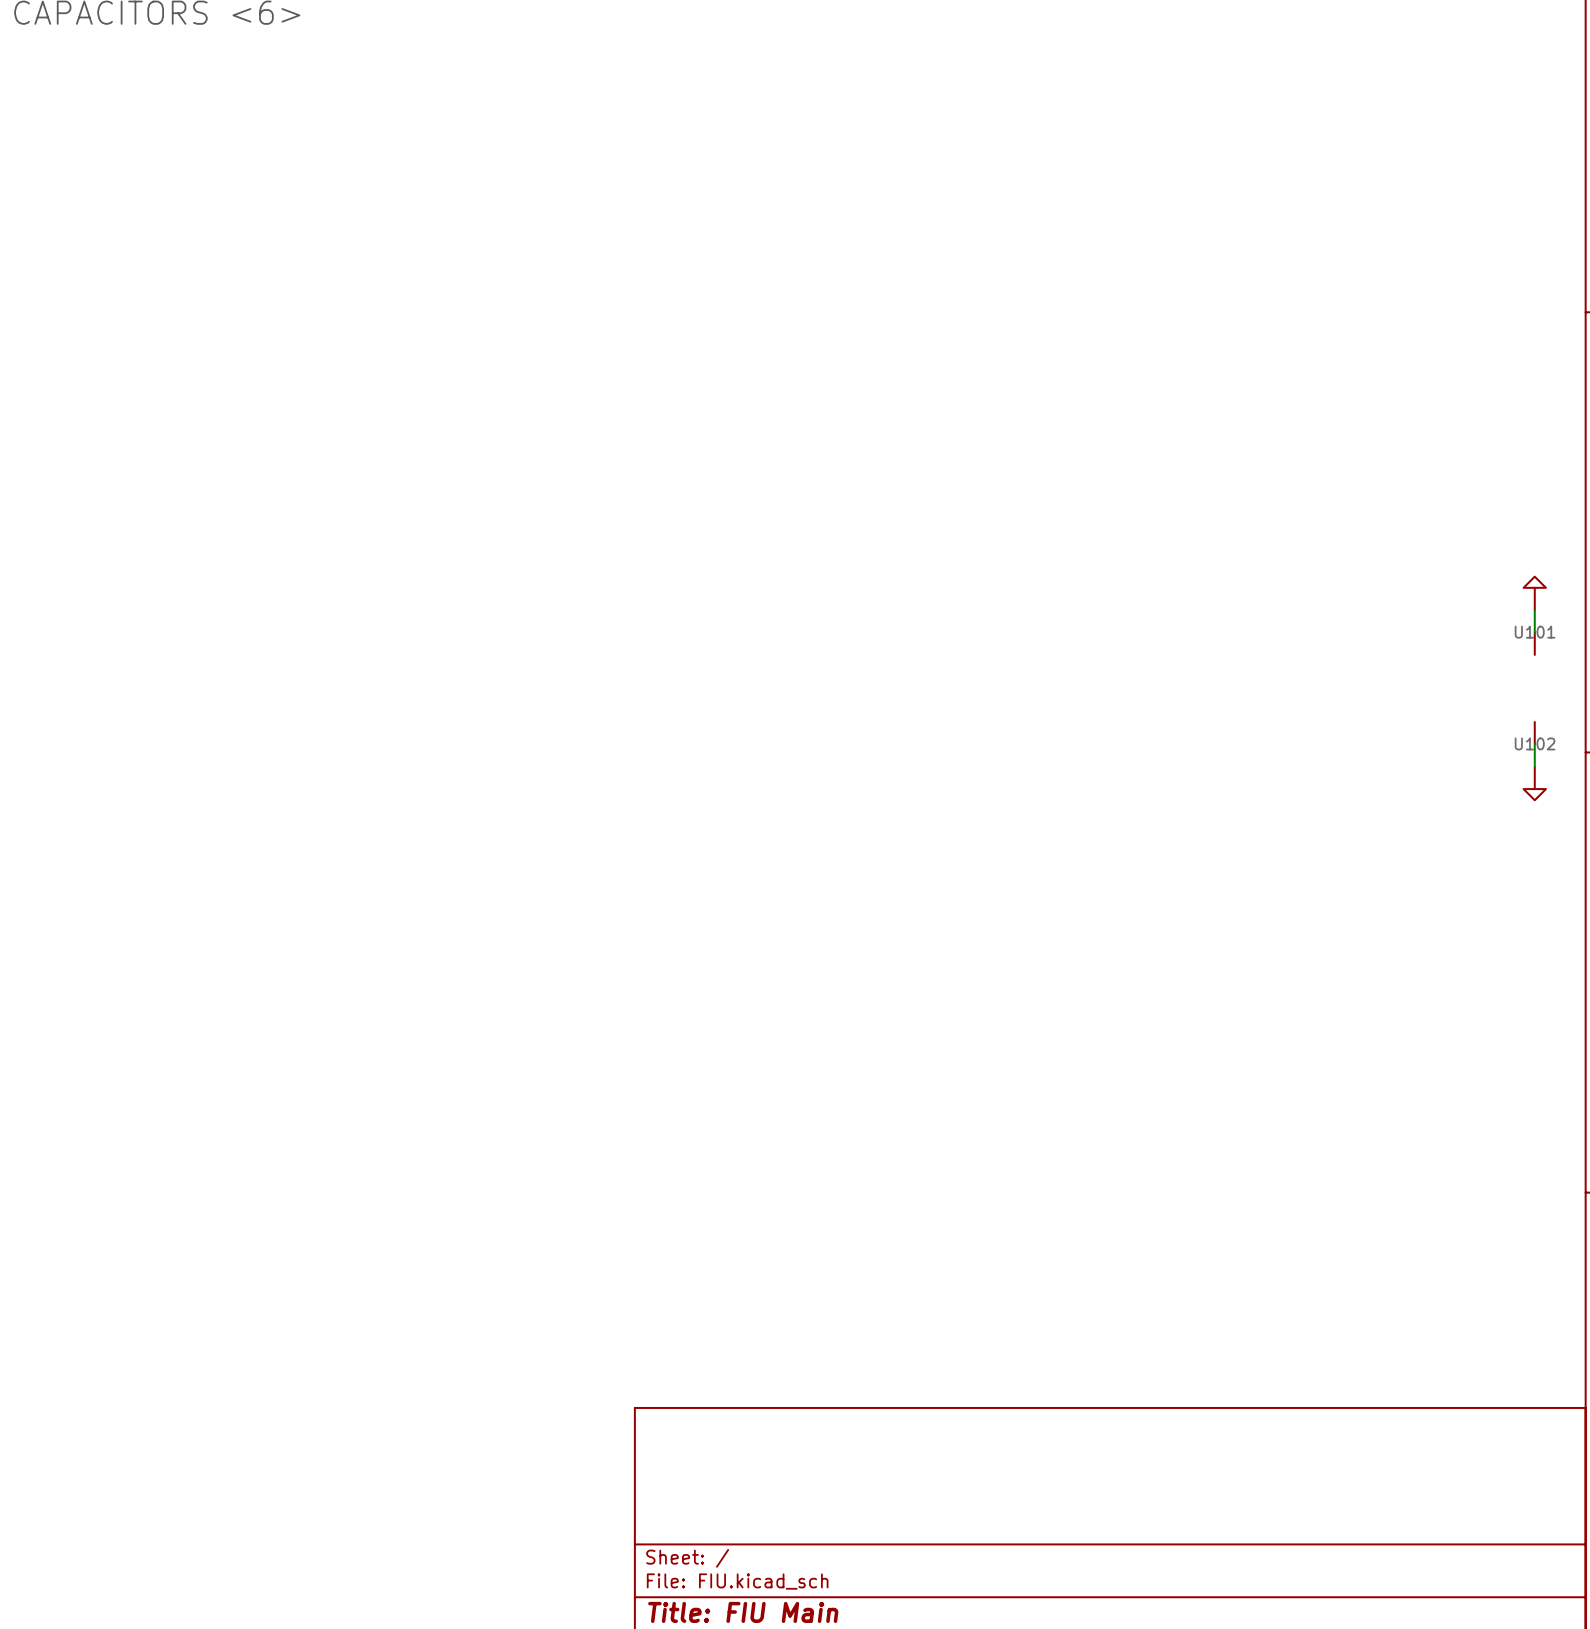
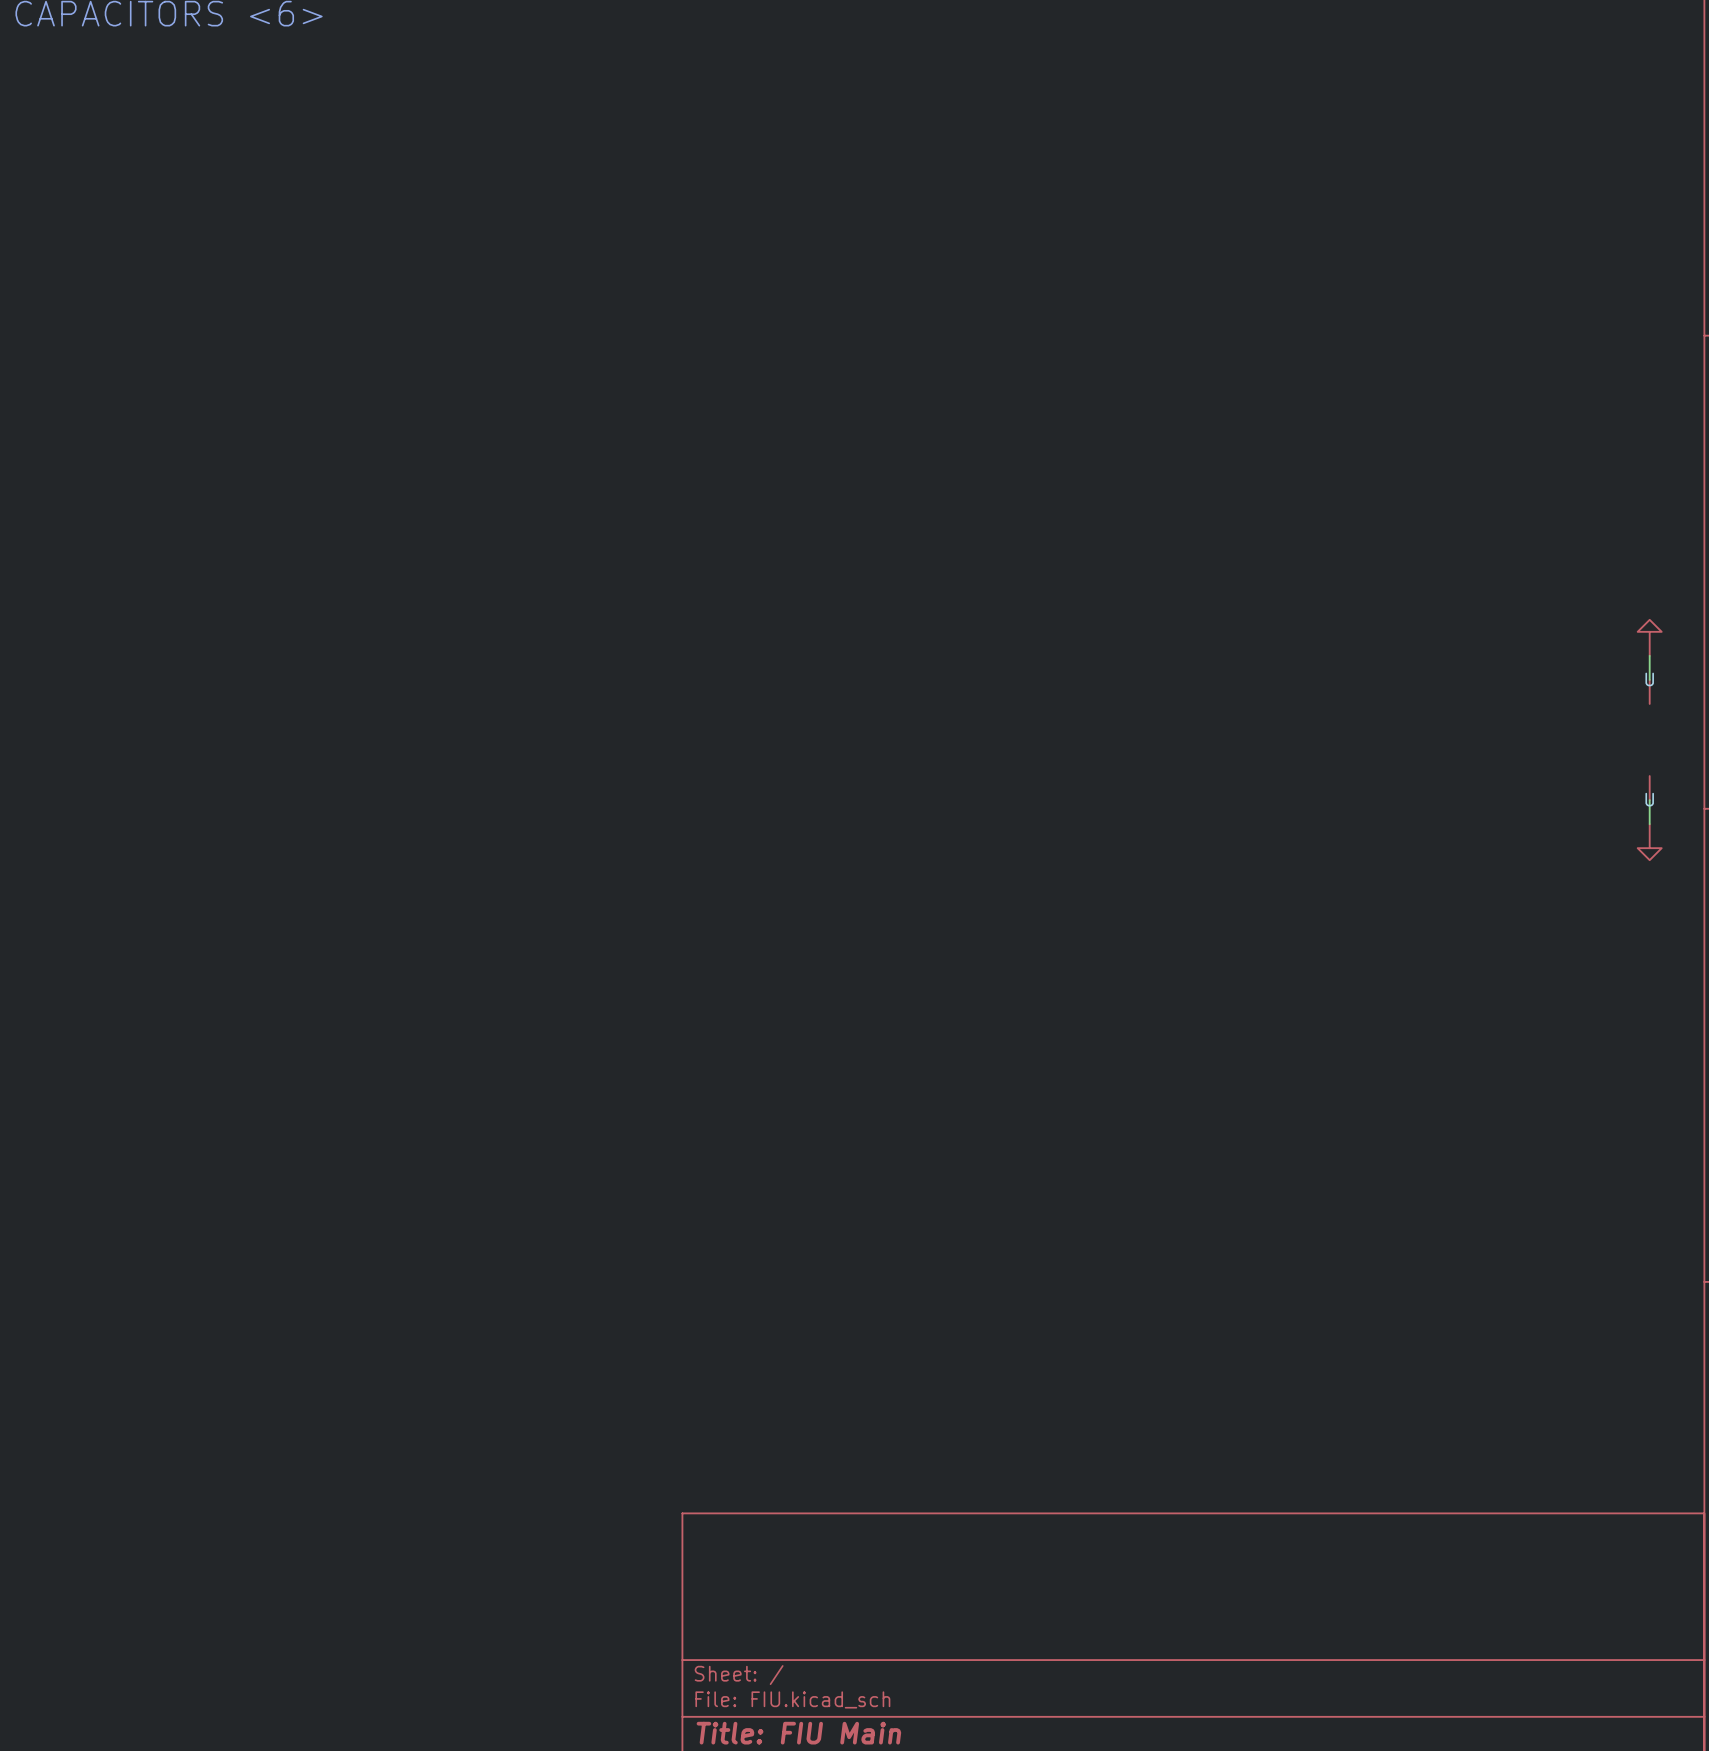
U101 name: U101 (1535, 632) -> U (1649, 679)
U102 name: U102 (1535, 743) -> U (1649, 799)

